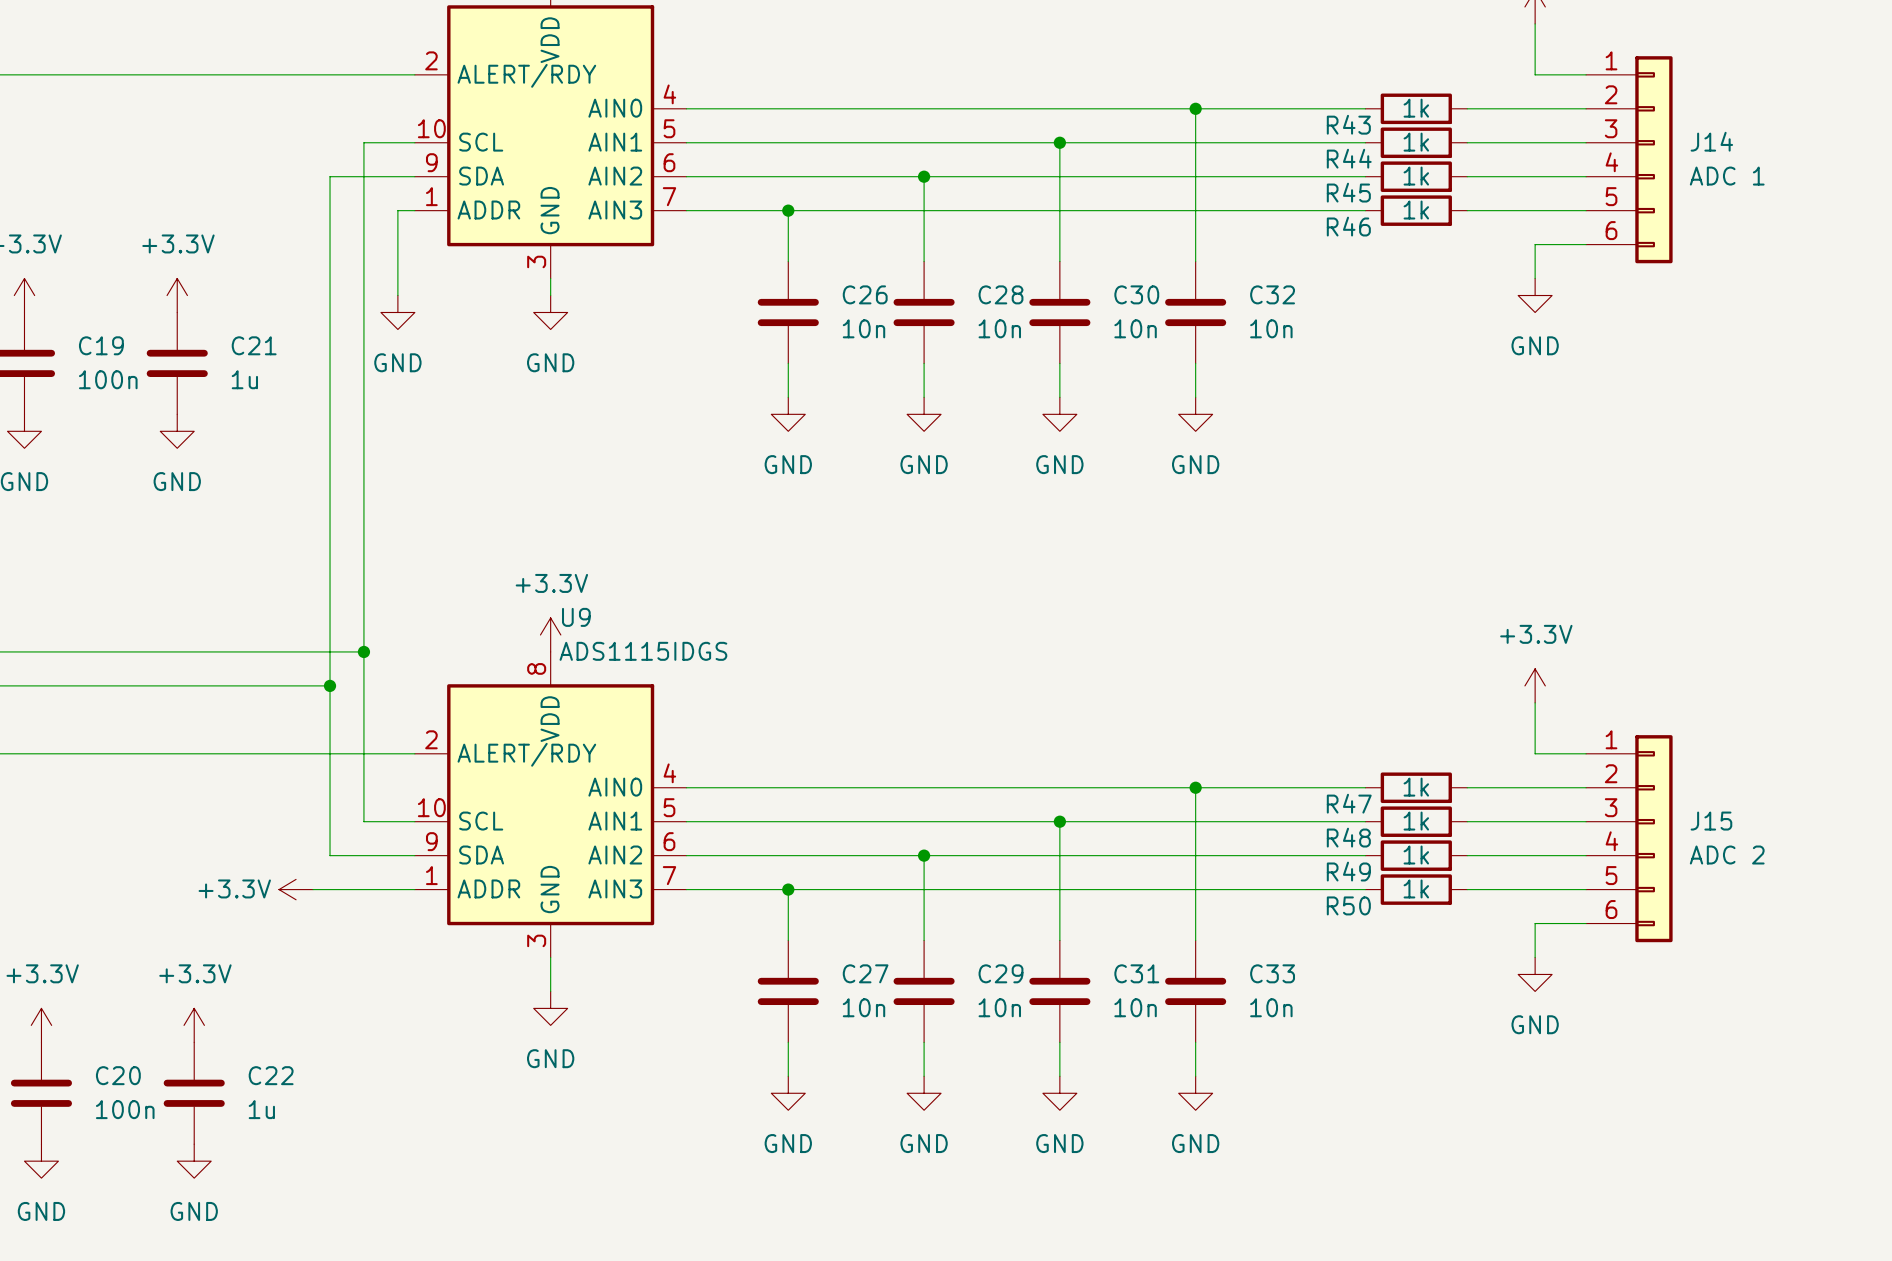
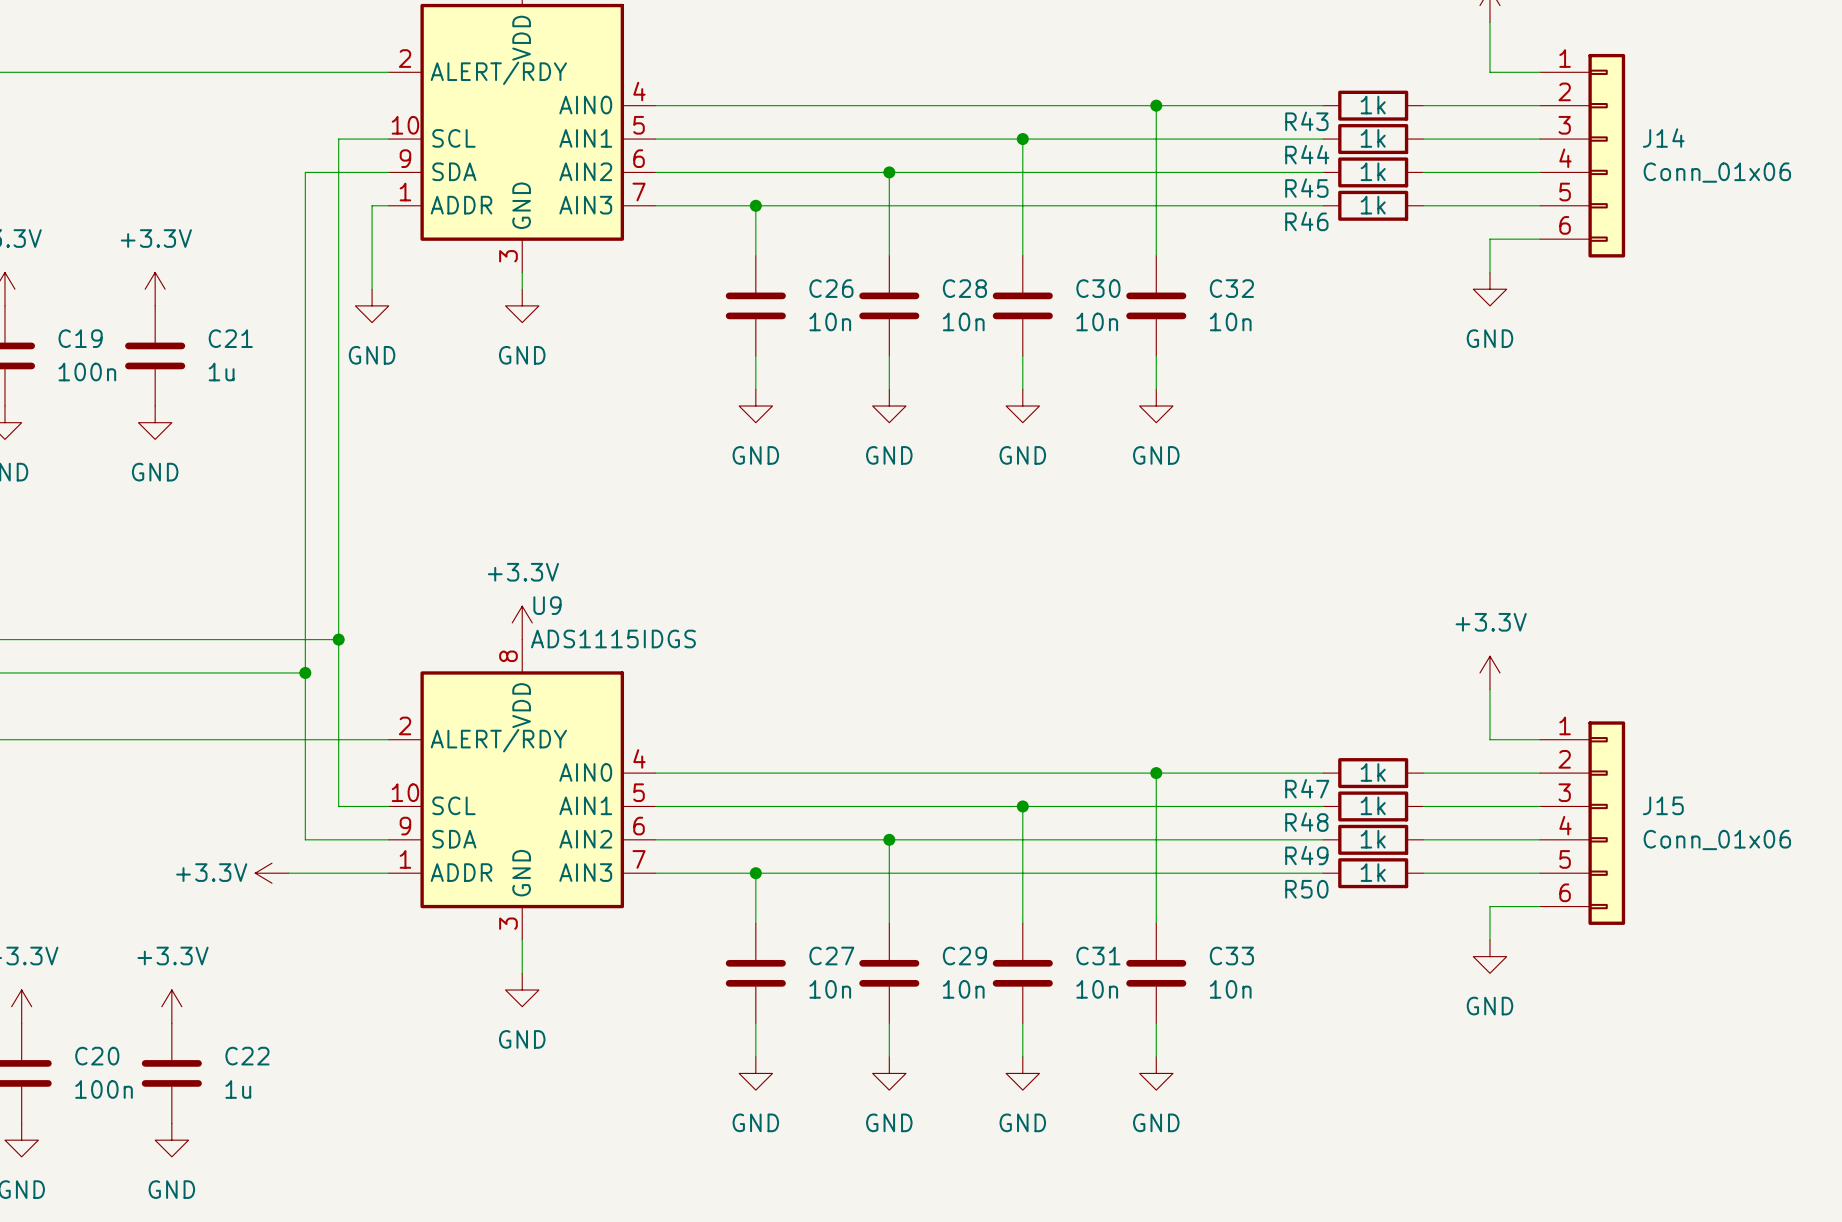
J14 value: ADC 1 (1727, 176) -> Conn_01x06 (1717, 172)
J15 value: ADC 2 (1727, 855) -> Conn_01x06 (1717, 840)

